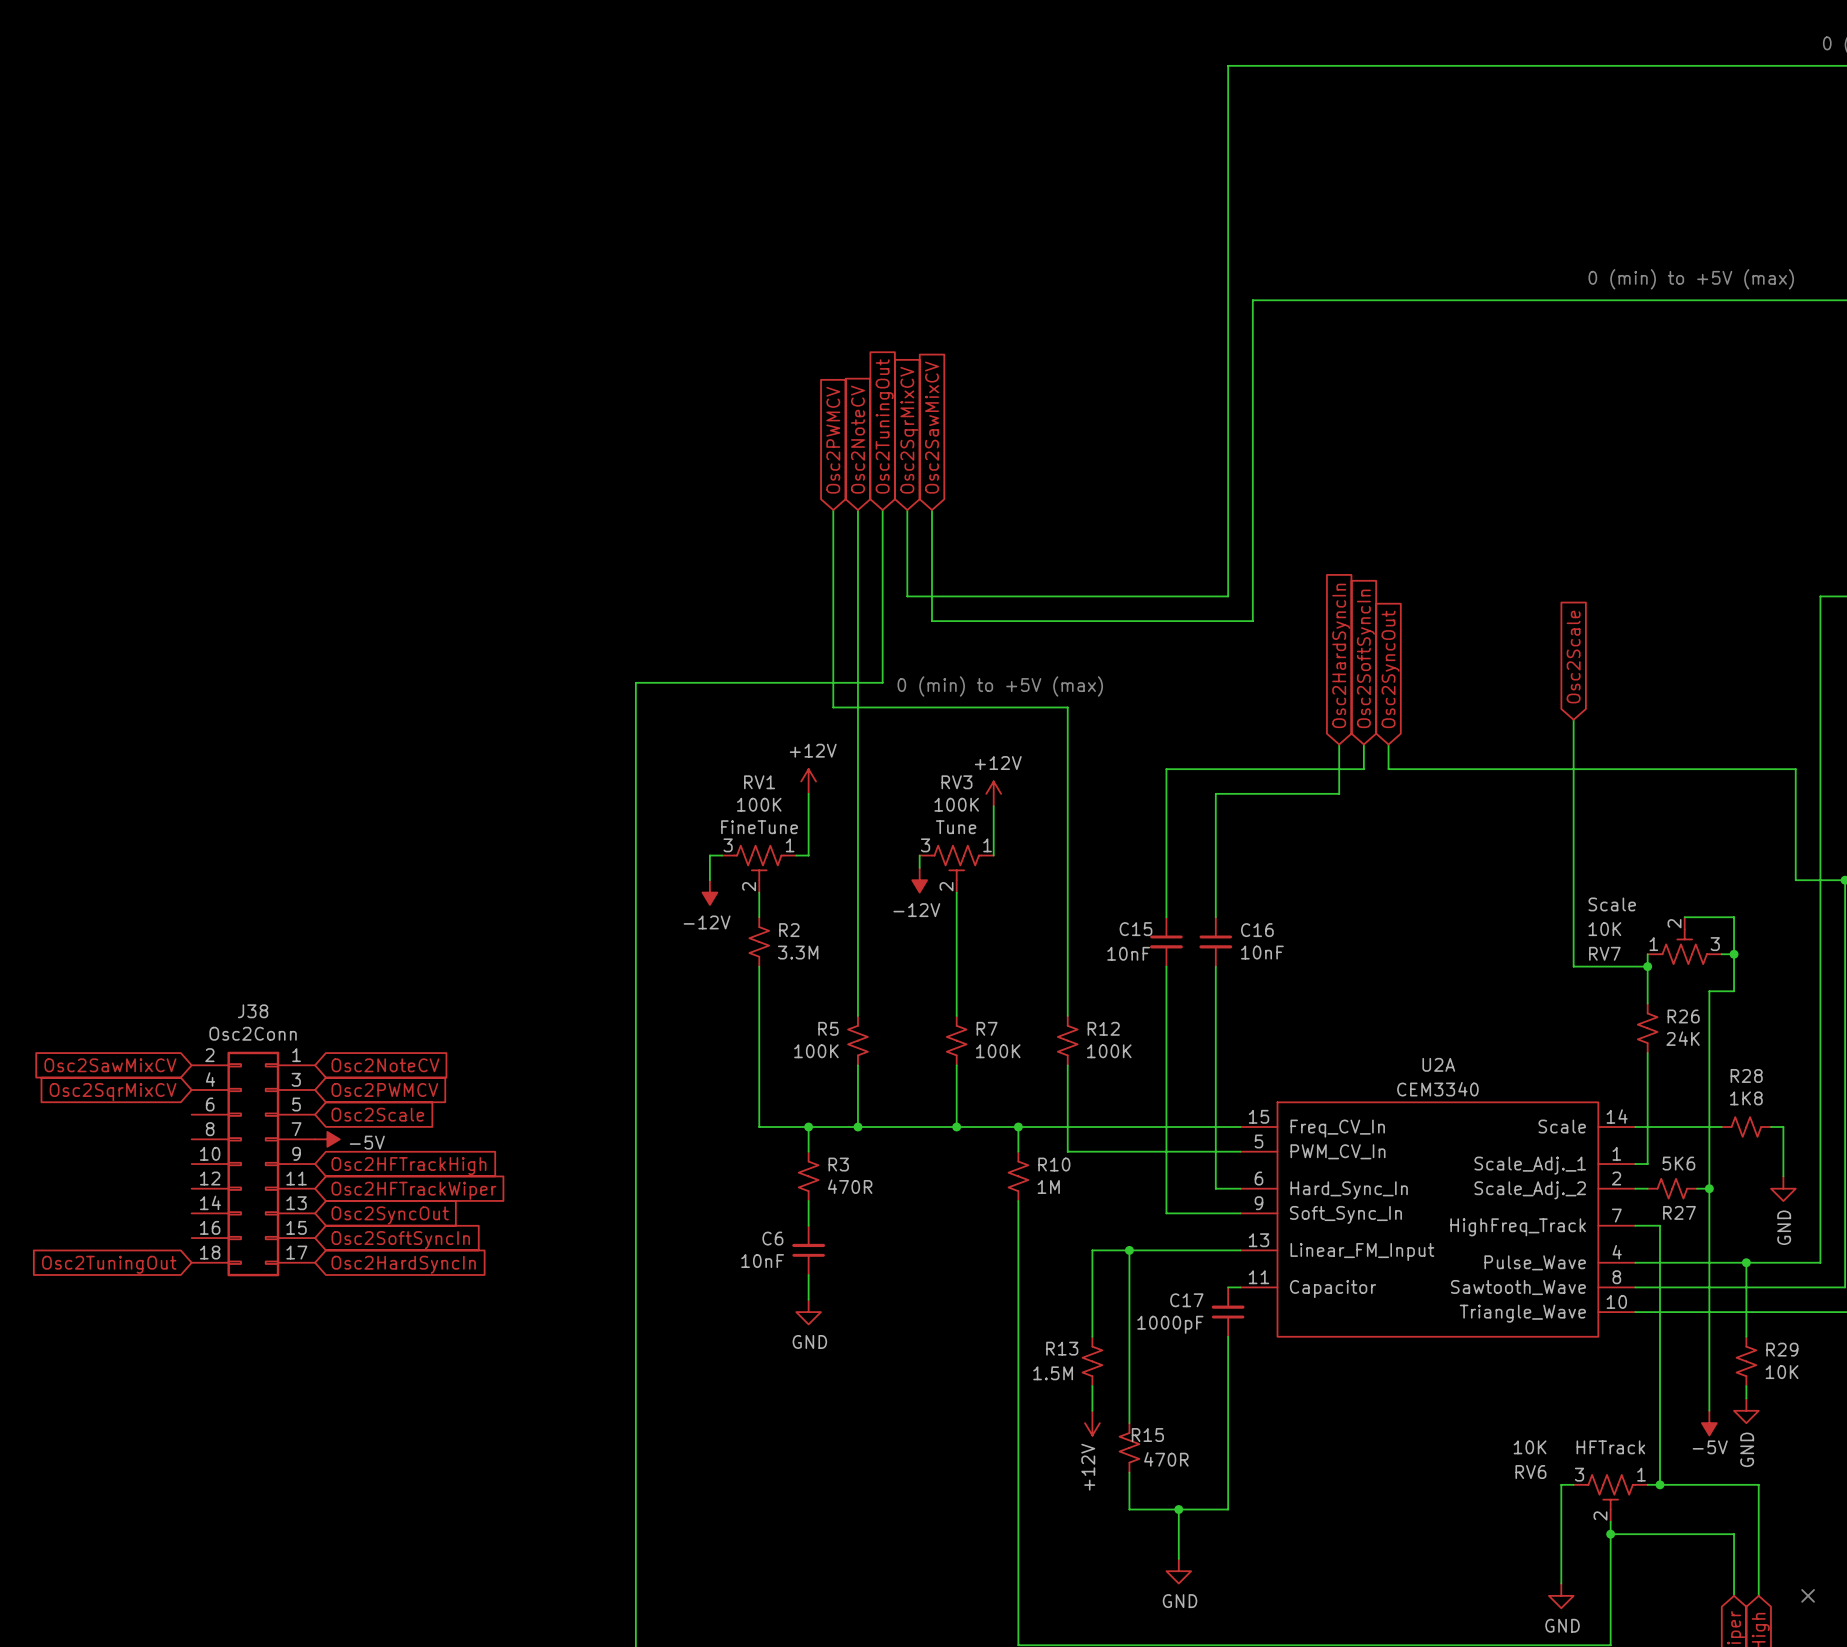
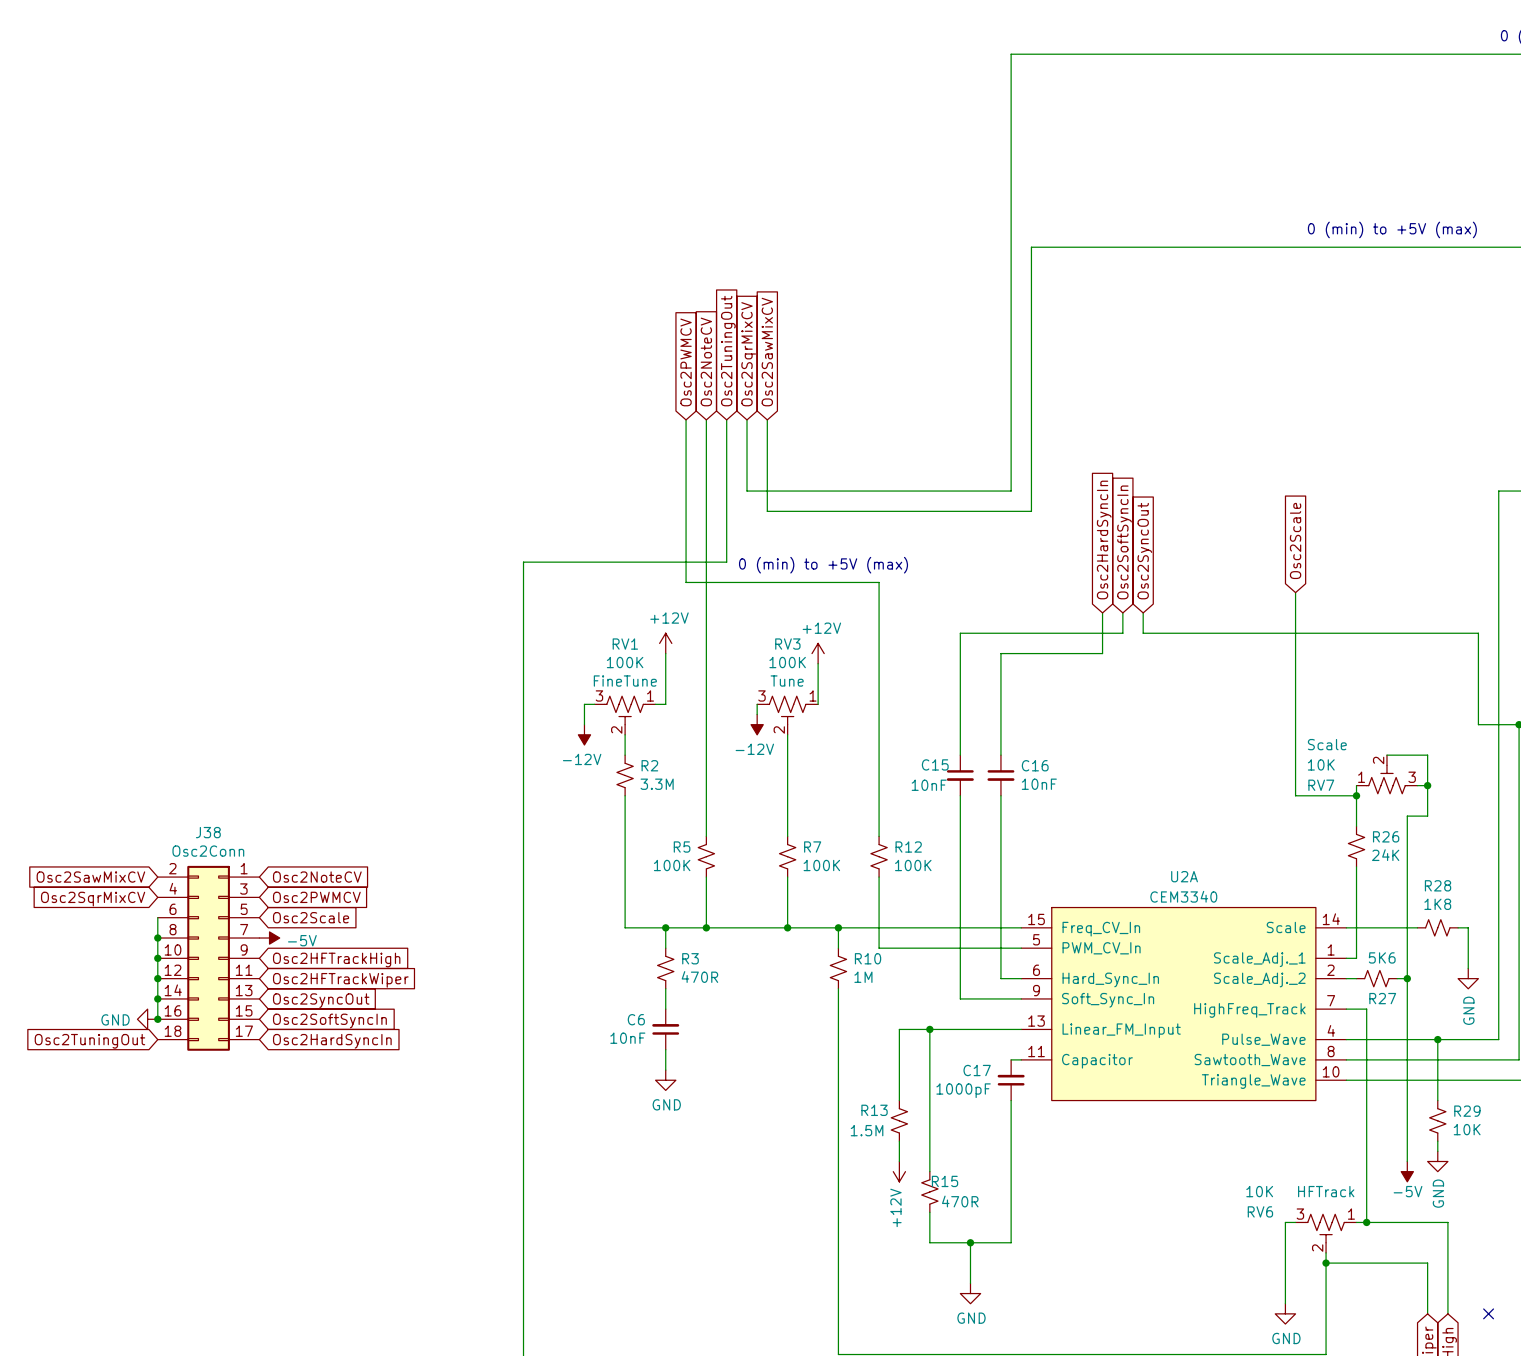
wire: none -> (157, 917) (157, 1019)
junction: none -> (157, 938)
junction: none -> (157, 958)
junction: none -> (157, 978)
junction: none -> (157, 998)
power symbol: none -> GND (147, 1019)
junction: none -> (157, 1019)

